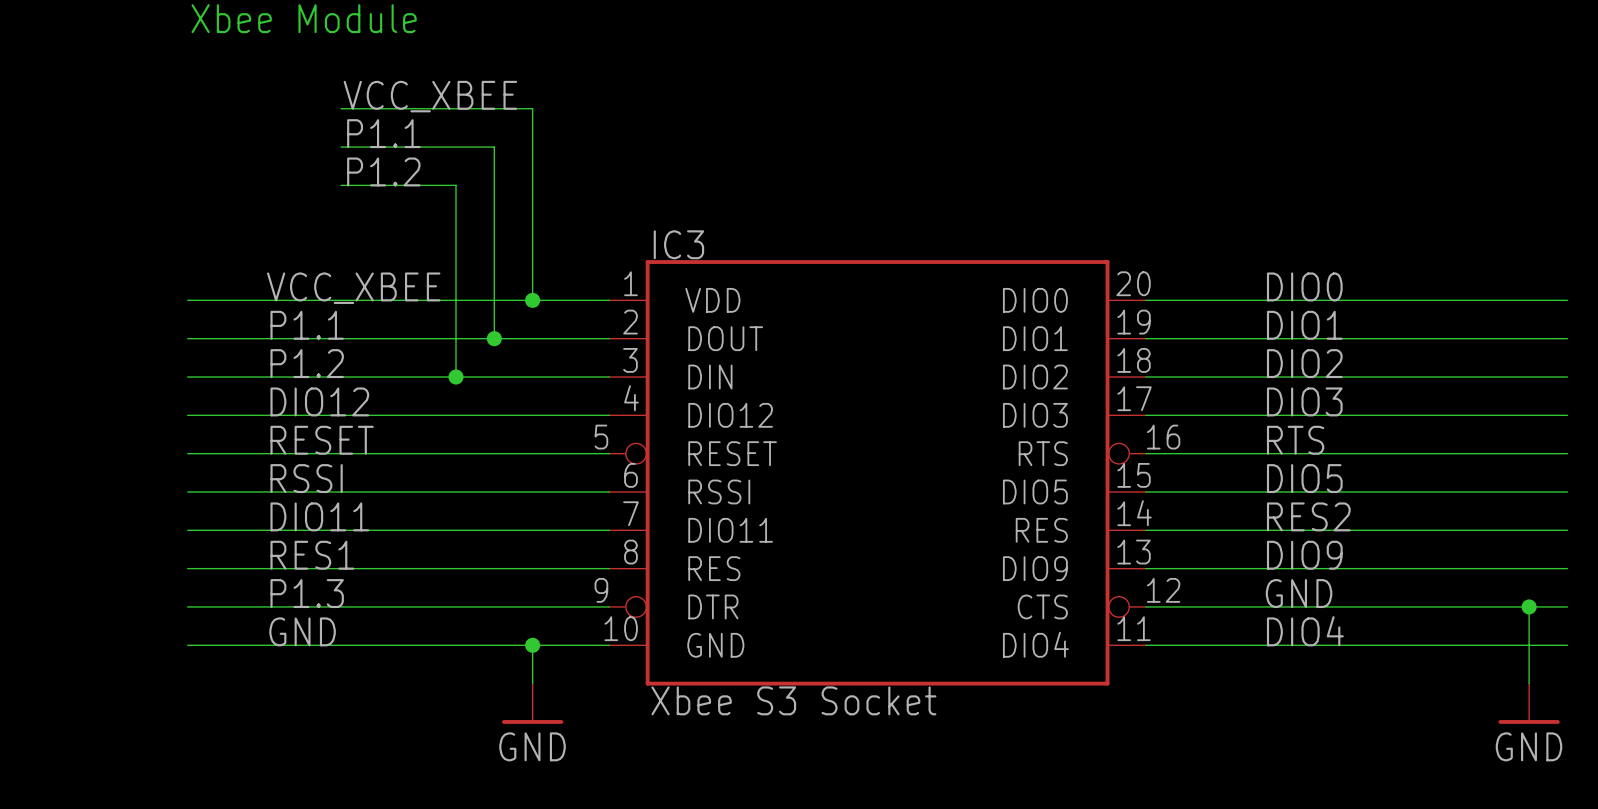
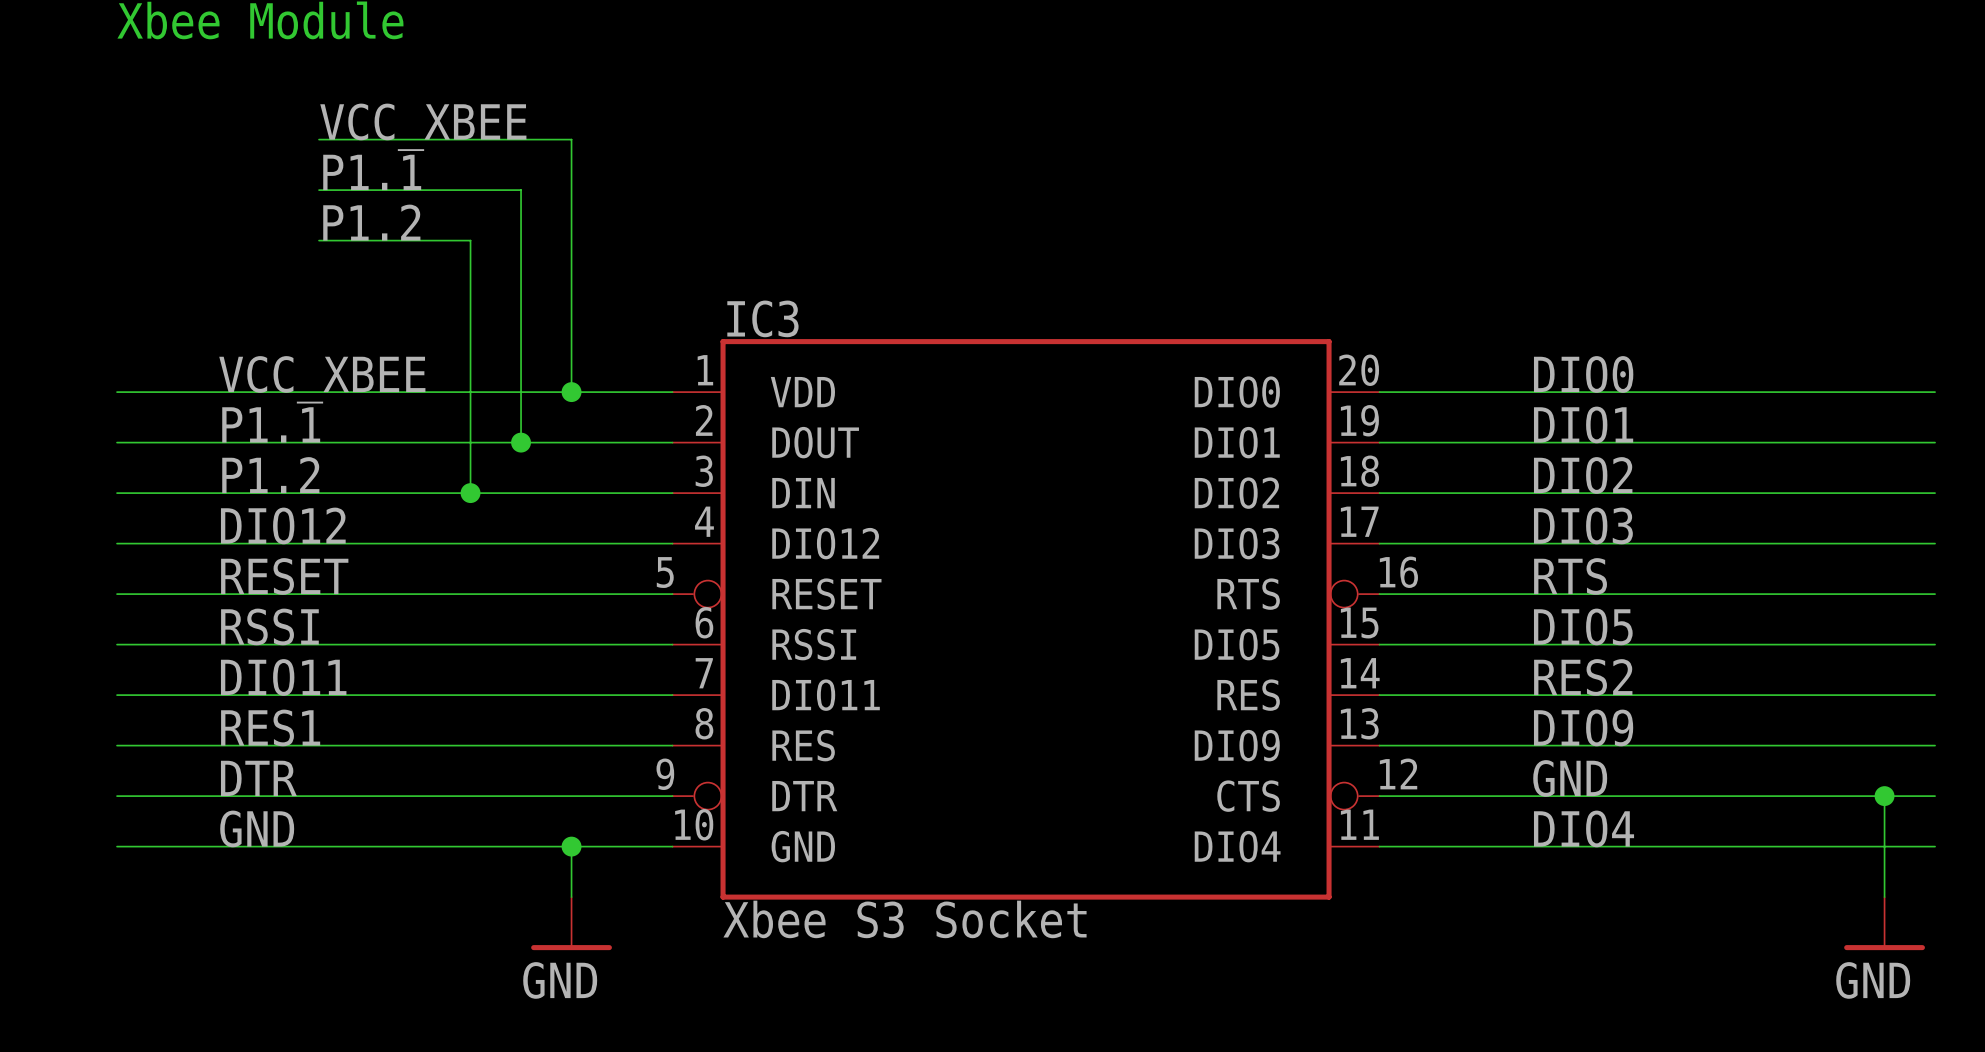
label: P1.3 (307, 593) -> DTR (258, 778)

